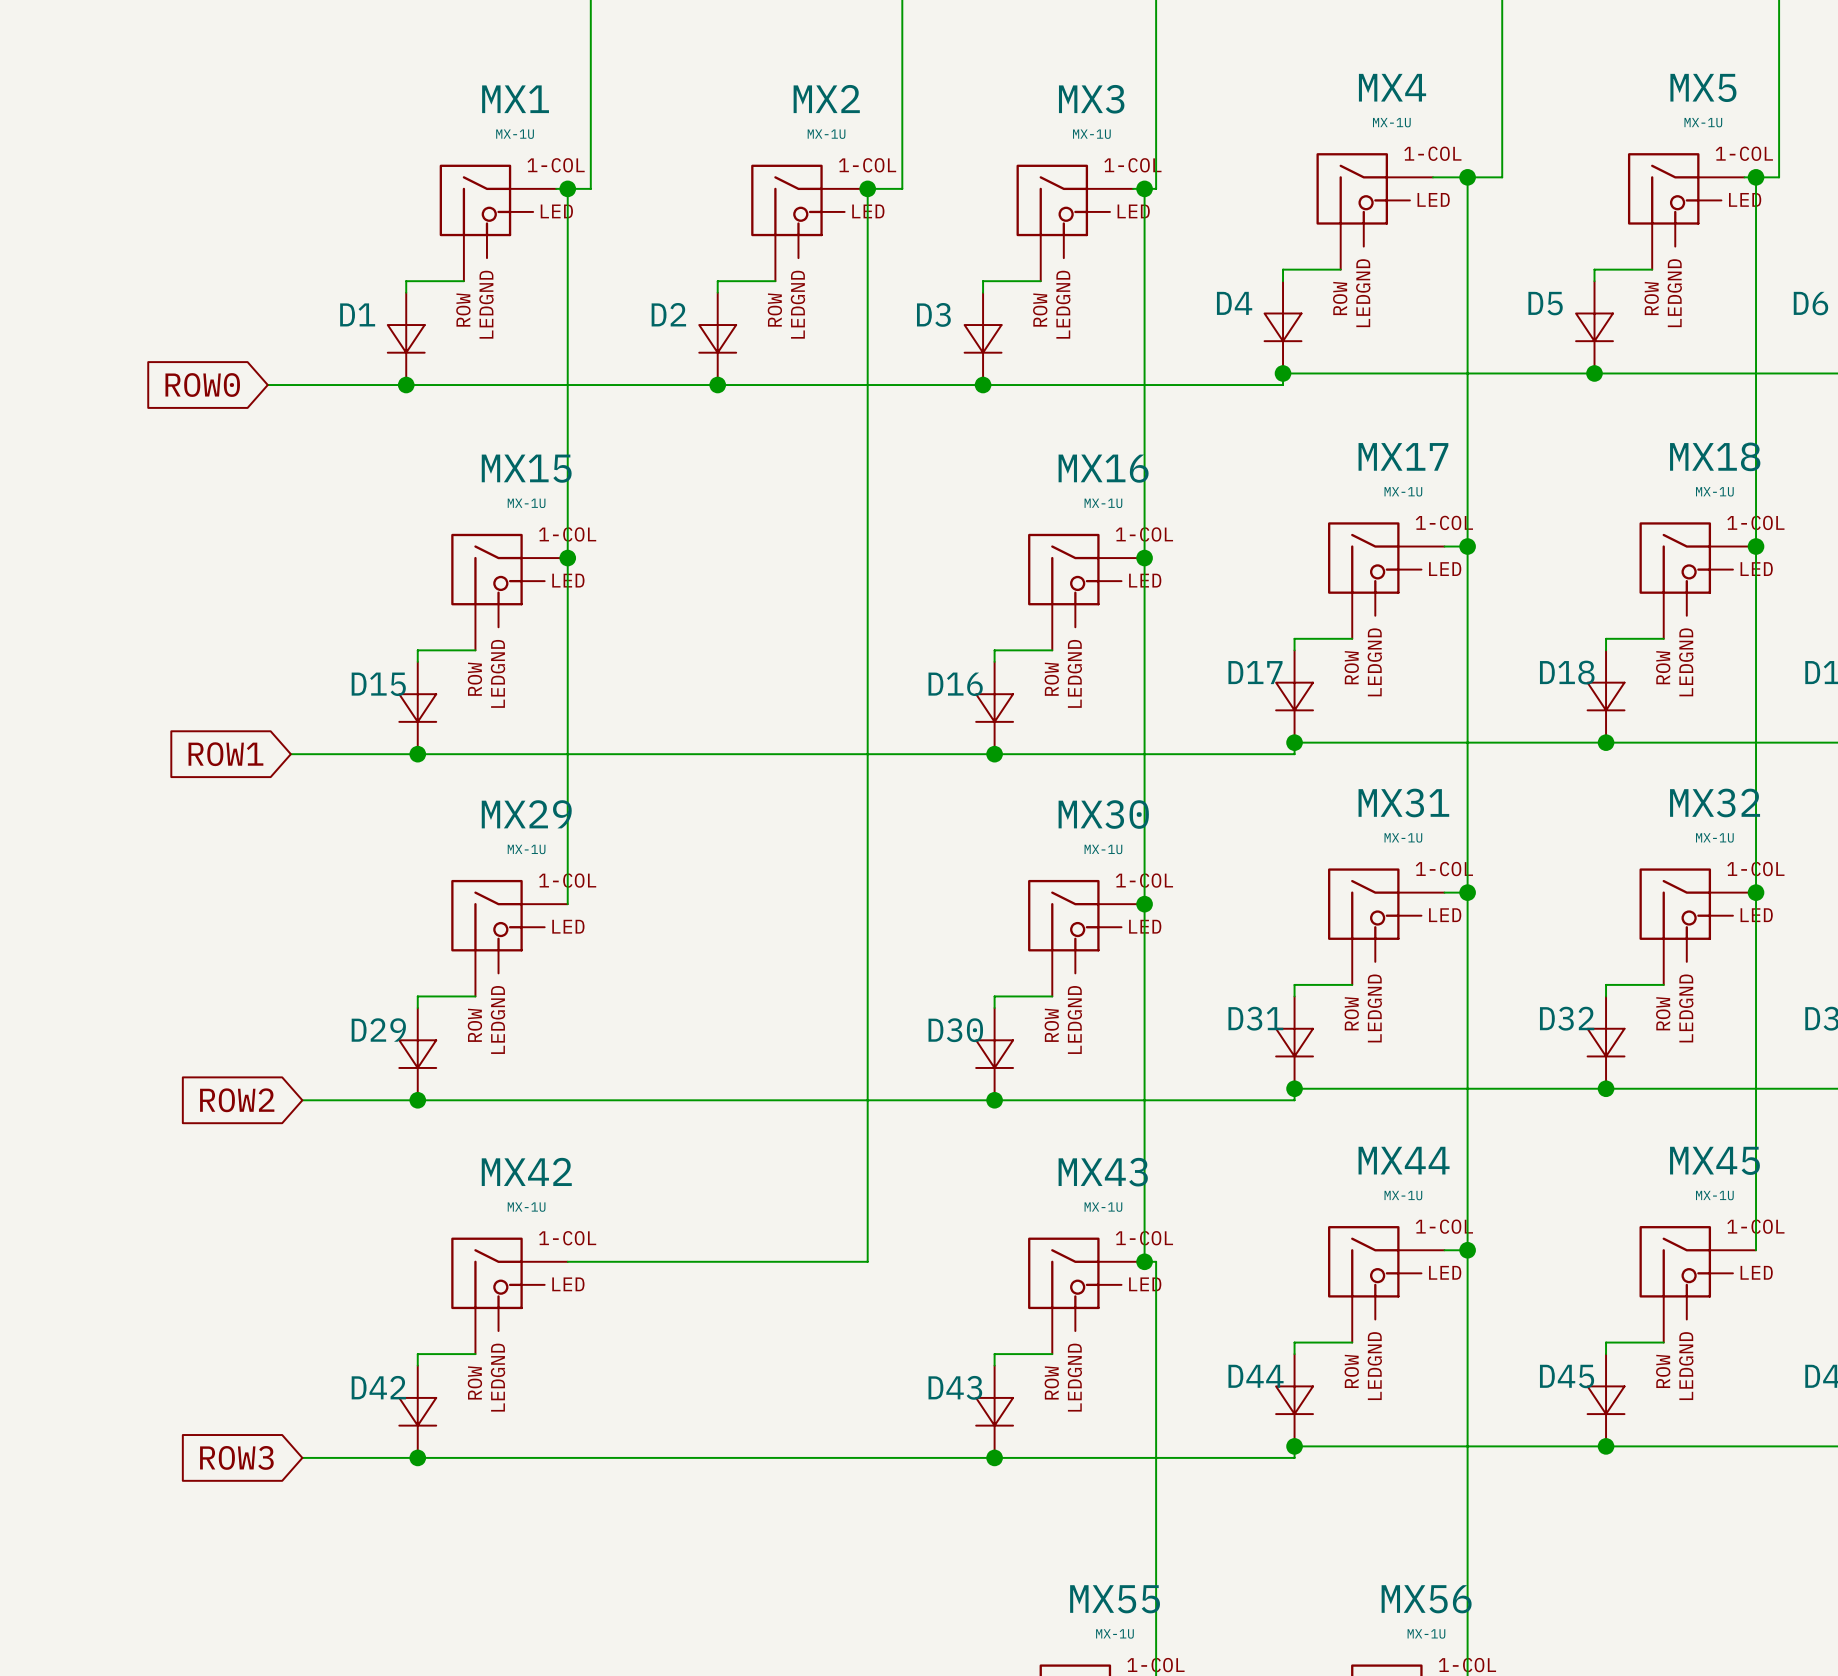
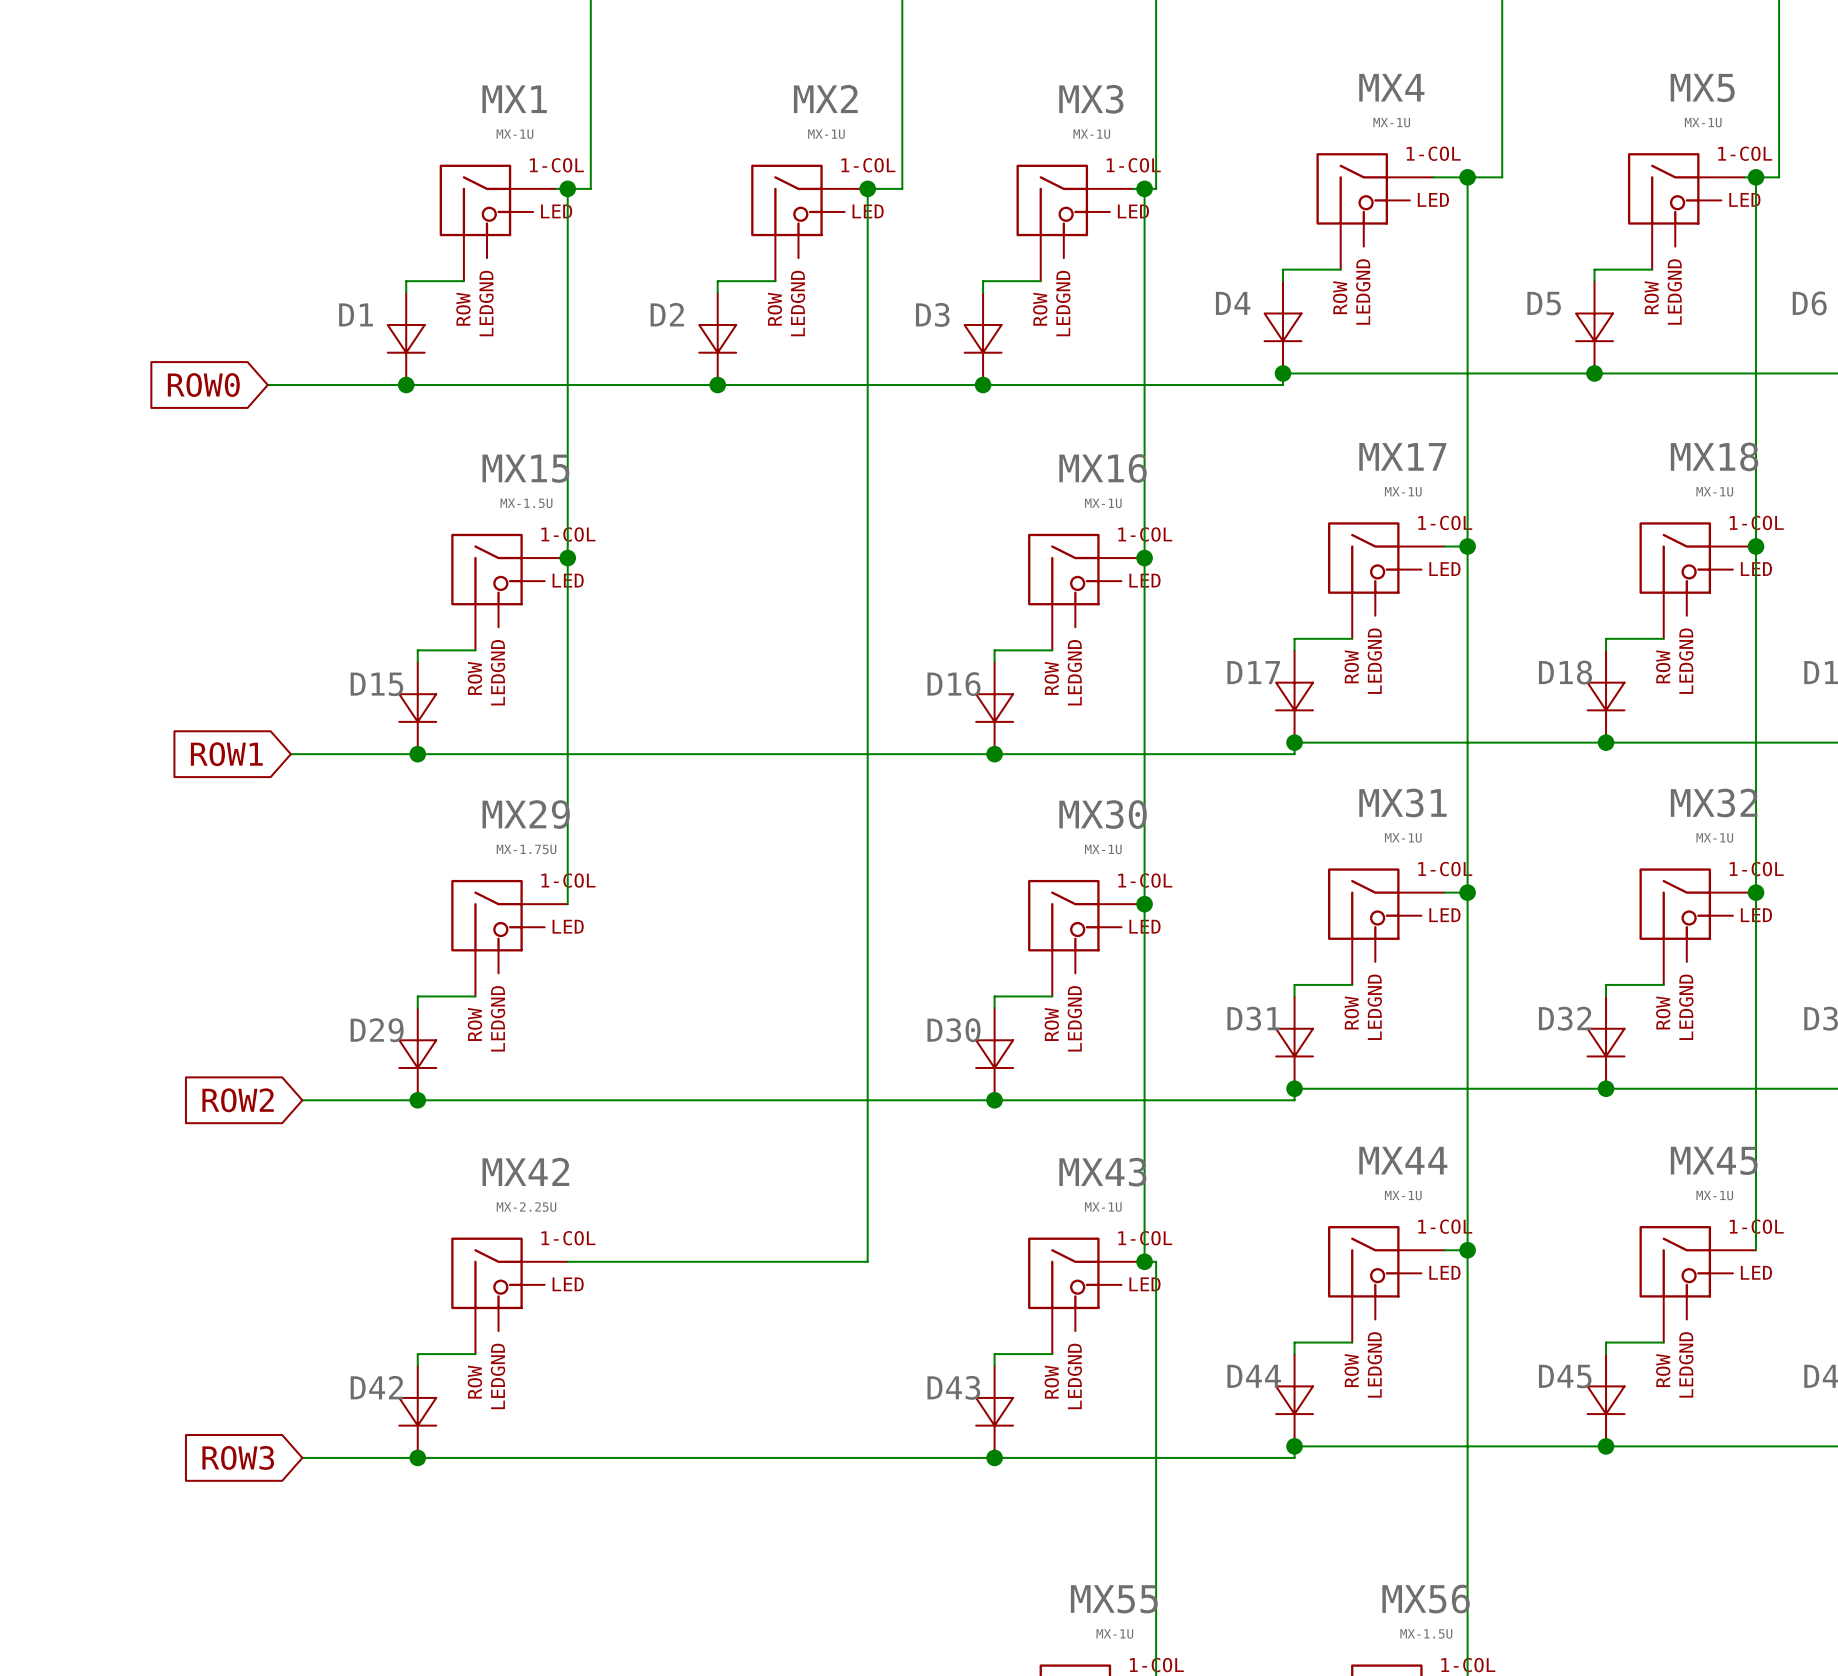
MX15 value: MX-1U (526, 503) -> MX-1.5U (526, 503)
MX29 value: MX-1U (526, 849) -> MX-1.75U (526, 849)
MX42 value: MX-1U (526, 1207) -> MX-2.25U (526, 1207)
MX56 value: MX-1U (1426, 1633) -> MX-1.5U (1426, 1633)

